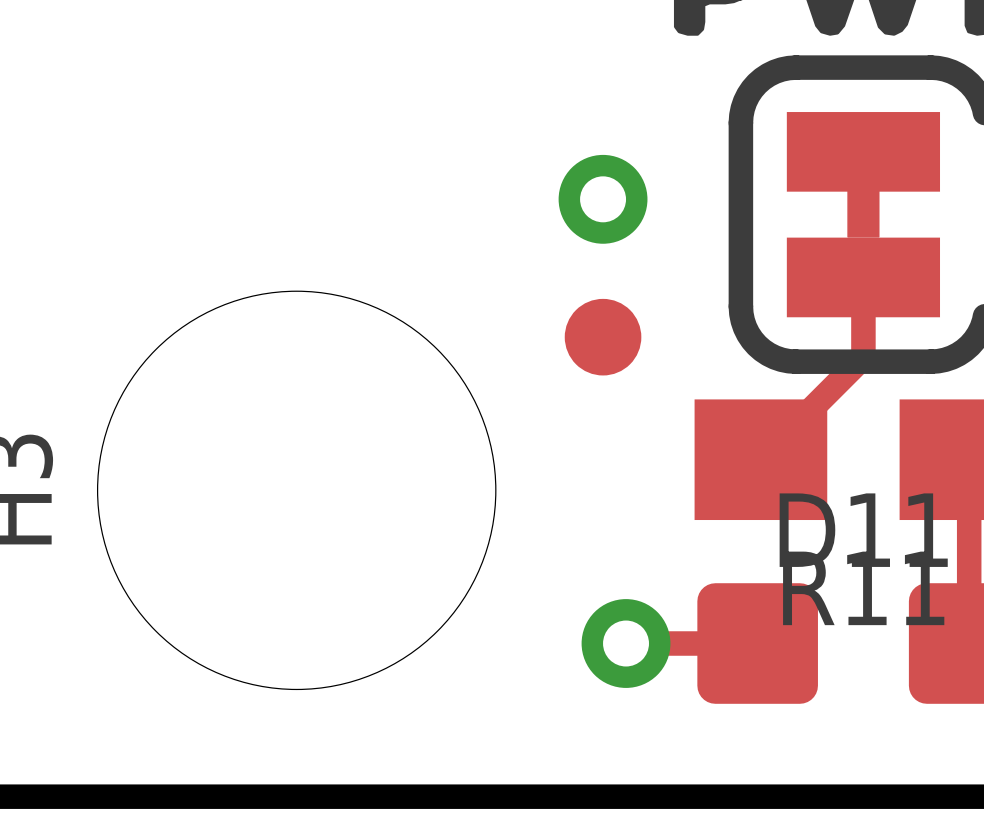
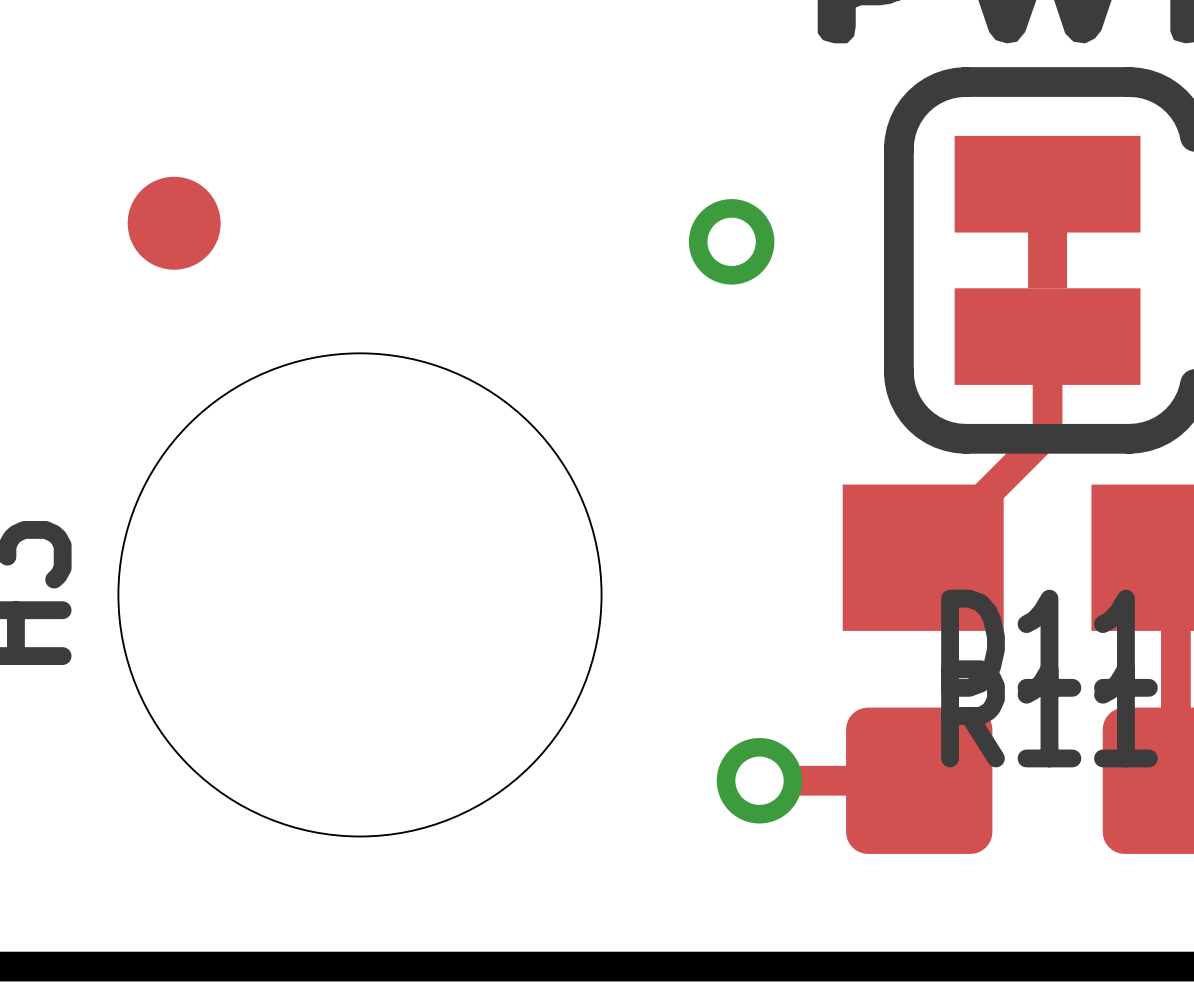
via size: [558, 154, 648, 244] -> [688, 199, 775, 285]
part position: (603, 337) -> (174, 223)
via size: [581, 599, 671, 688] -> [716, 738, 803, 824]

